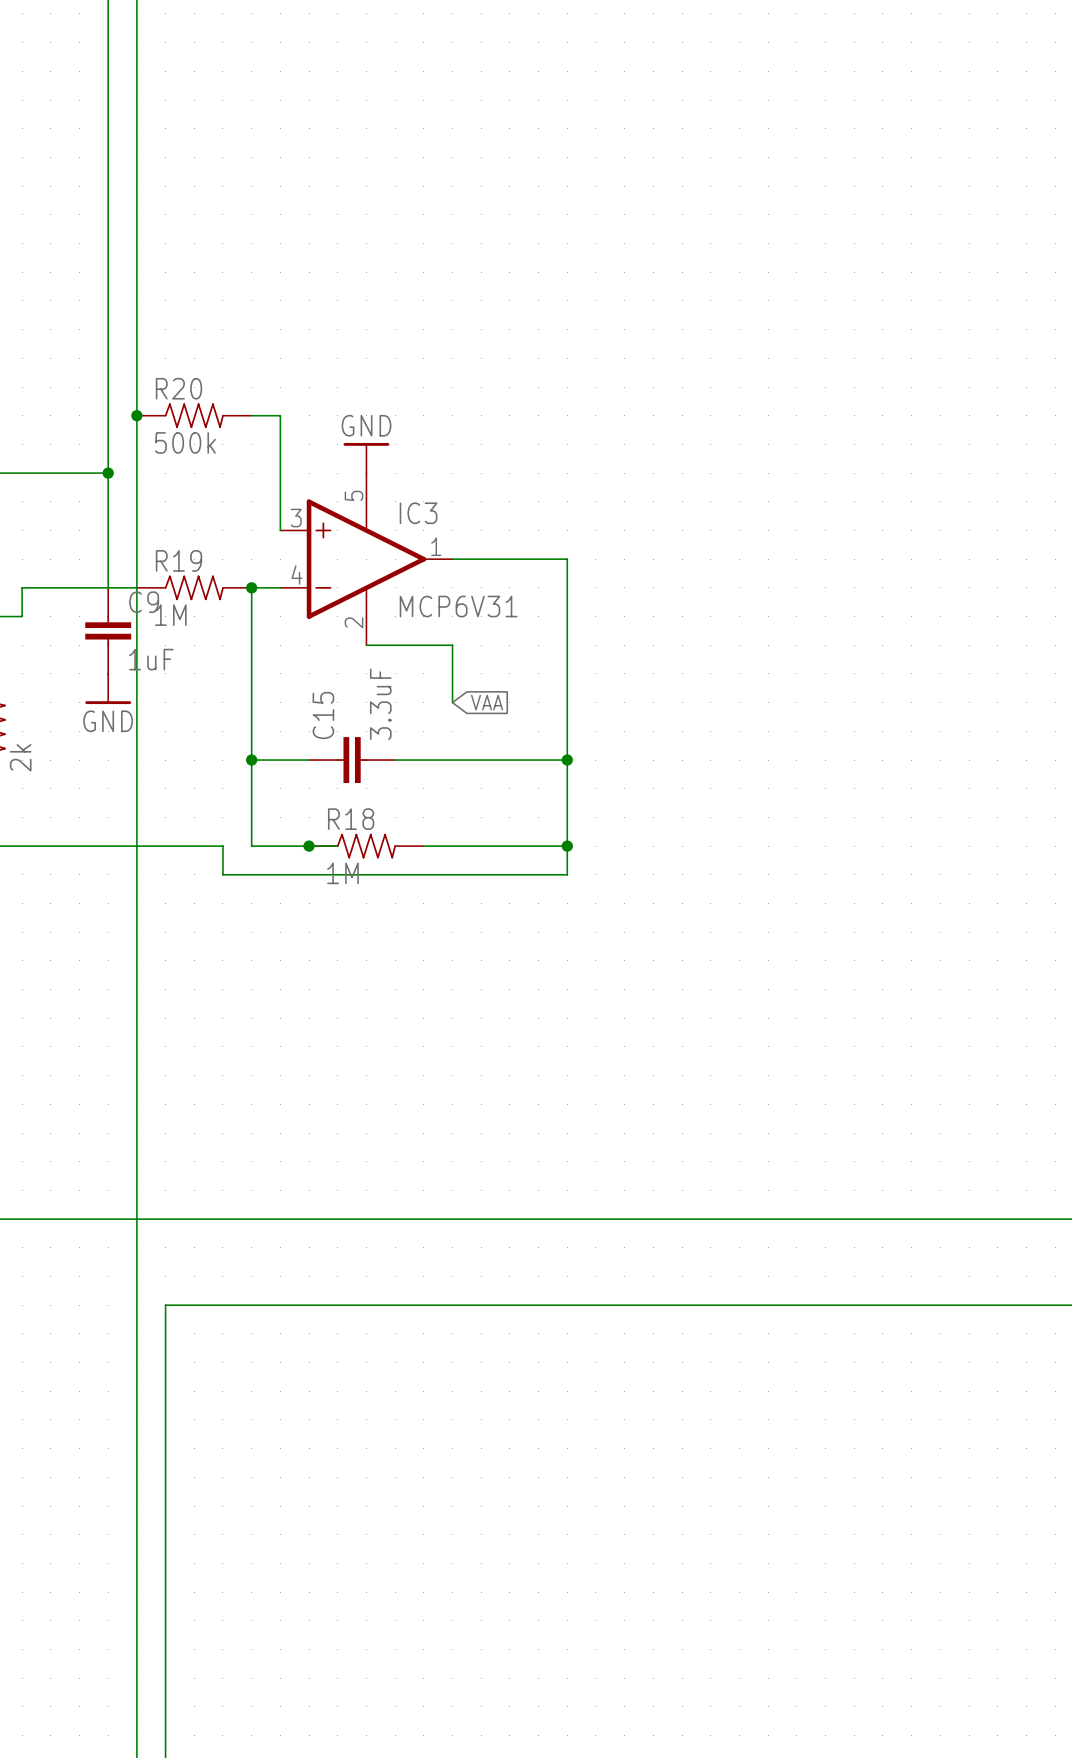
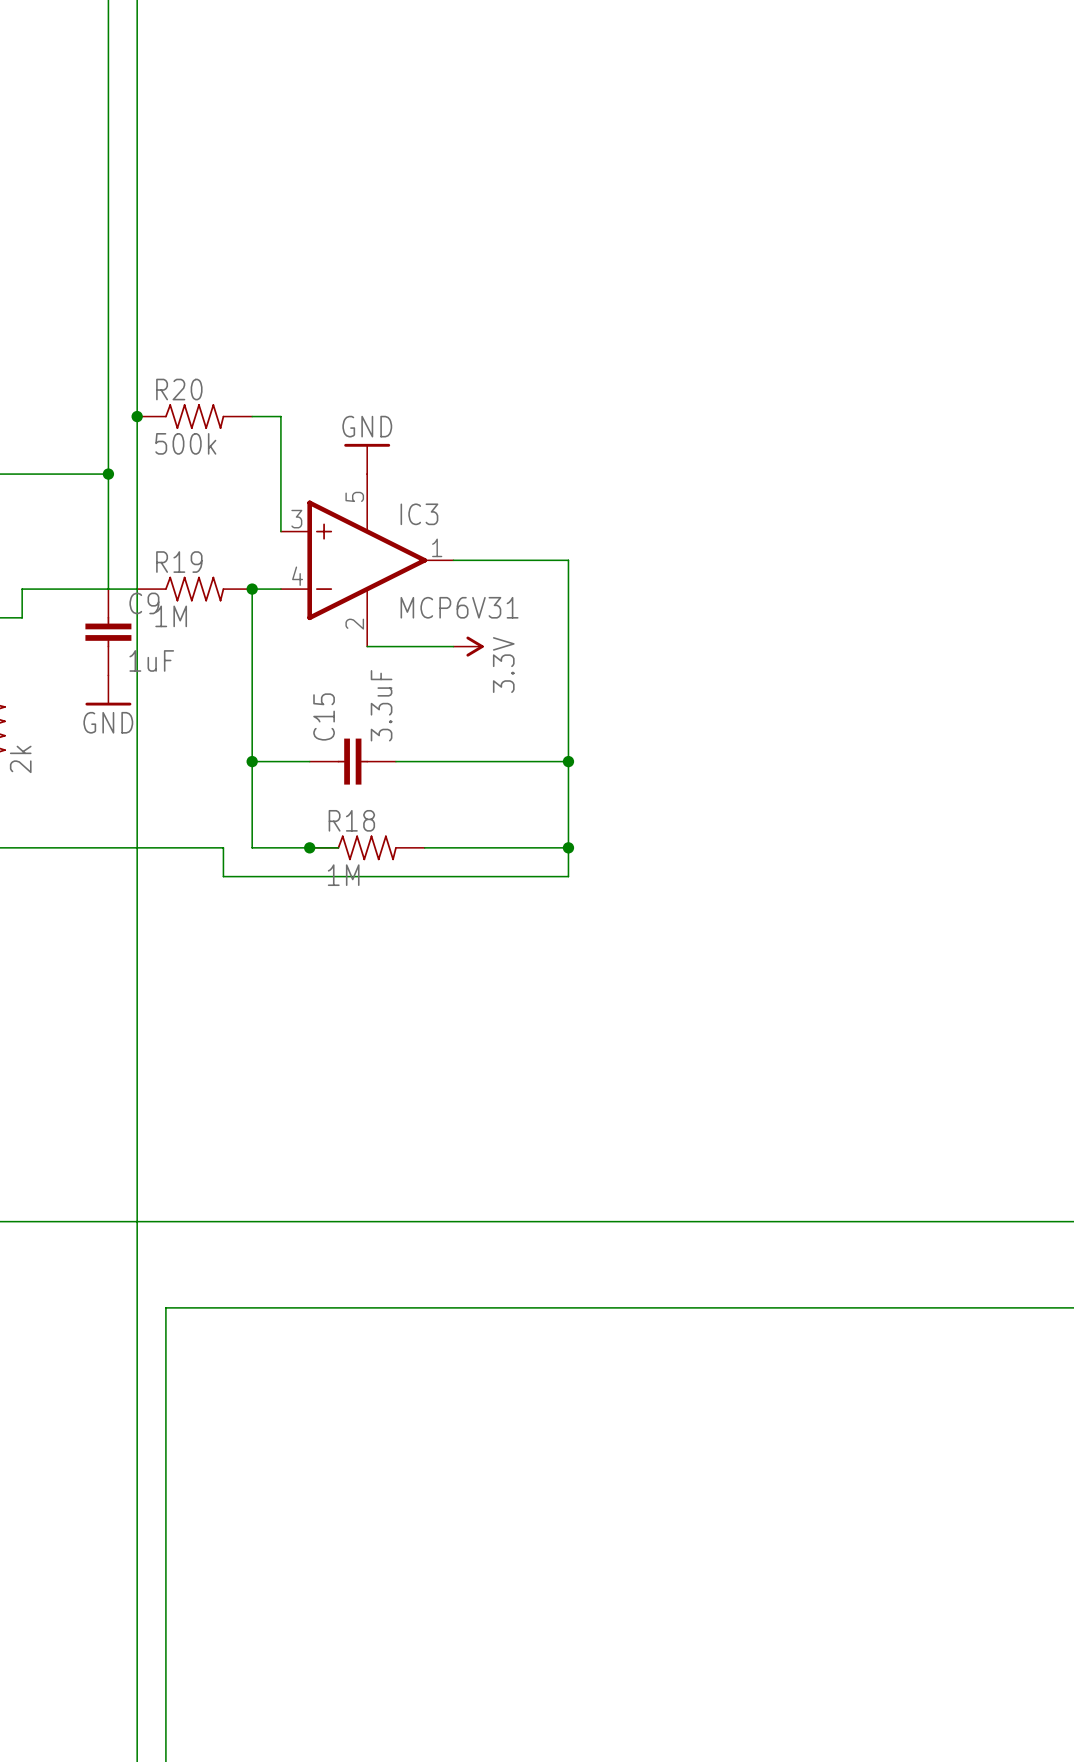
wire: (452, 645) (452, 702) -> none
power symbol: none -> 3.3V (468, 646)
global label: VAA (487, 702) -> none

